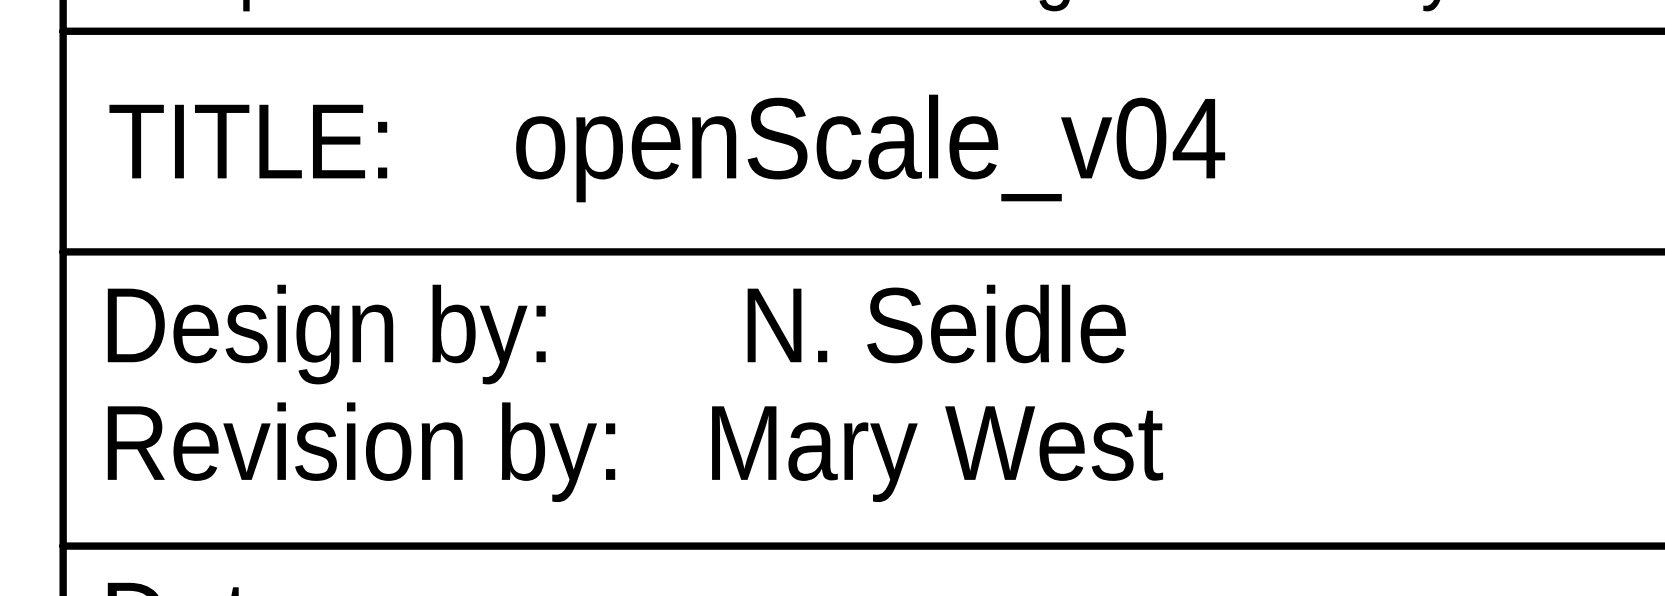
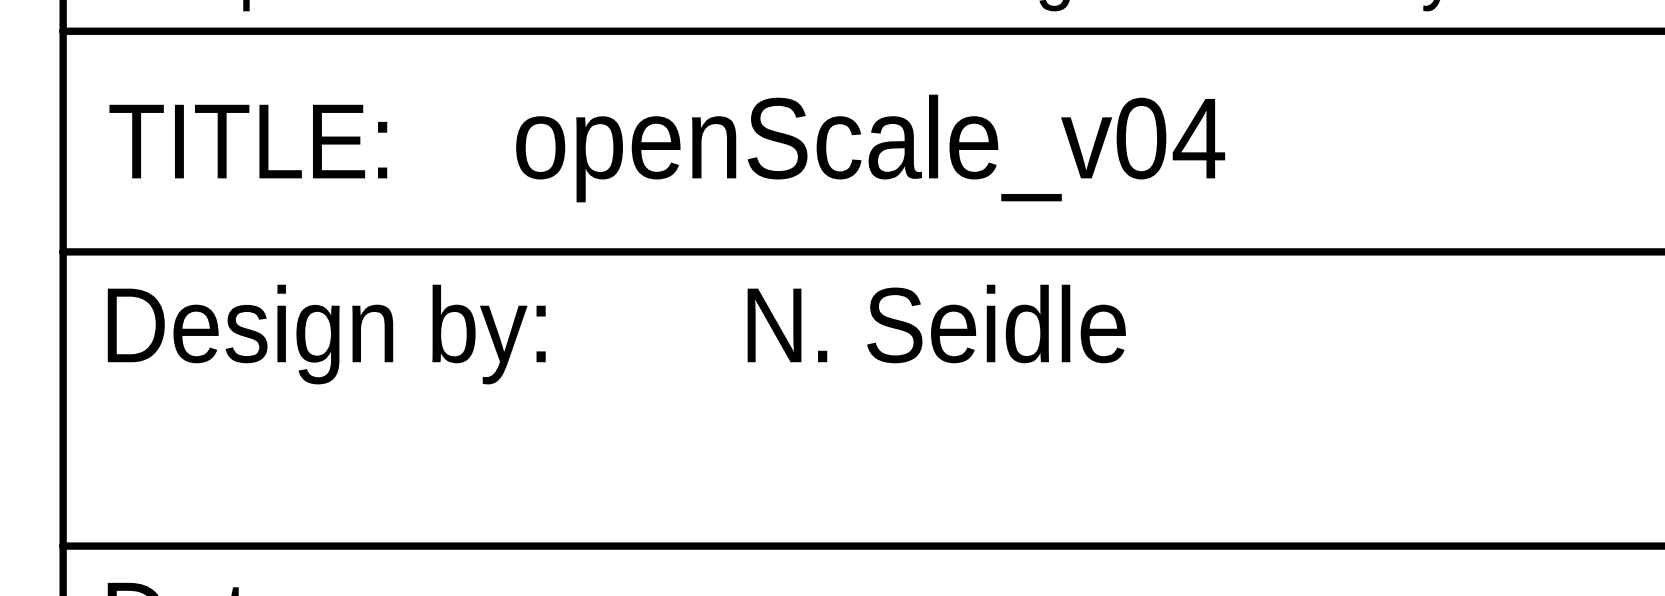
text: Revision by: Mary West (635, 452) -> none

